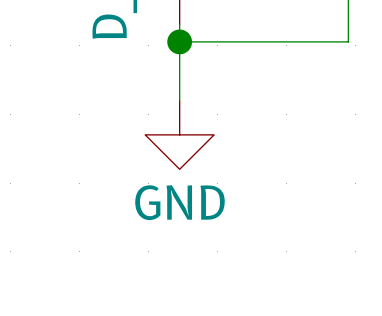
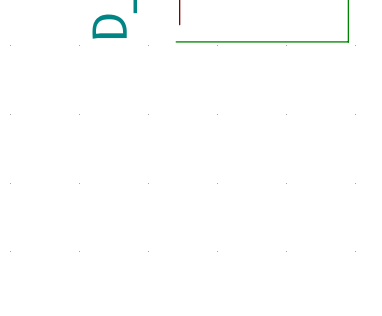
wire: (179, 24) (179, 100) -> none
junction: (179, 41) -> none
power symbol: GND (179, 134) -> none

